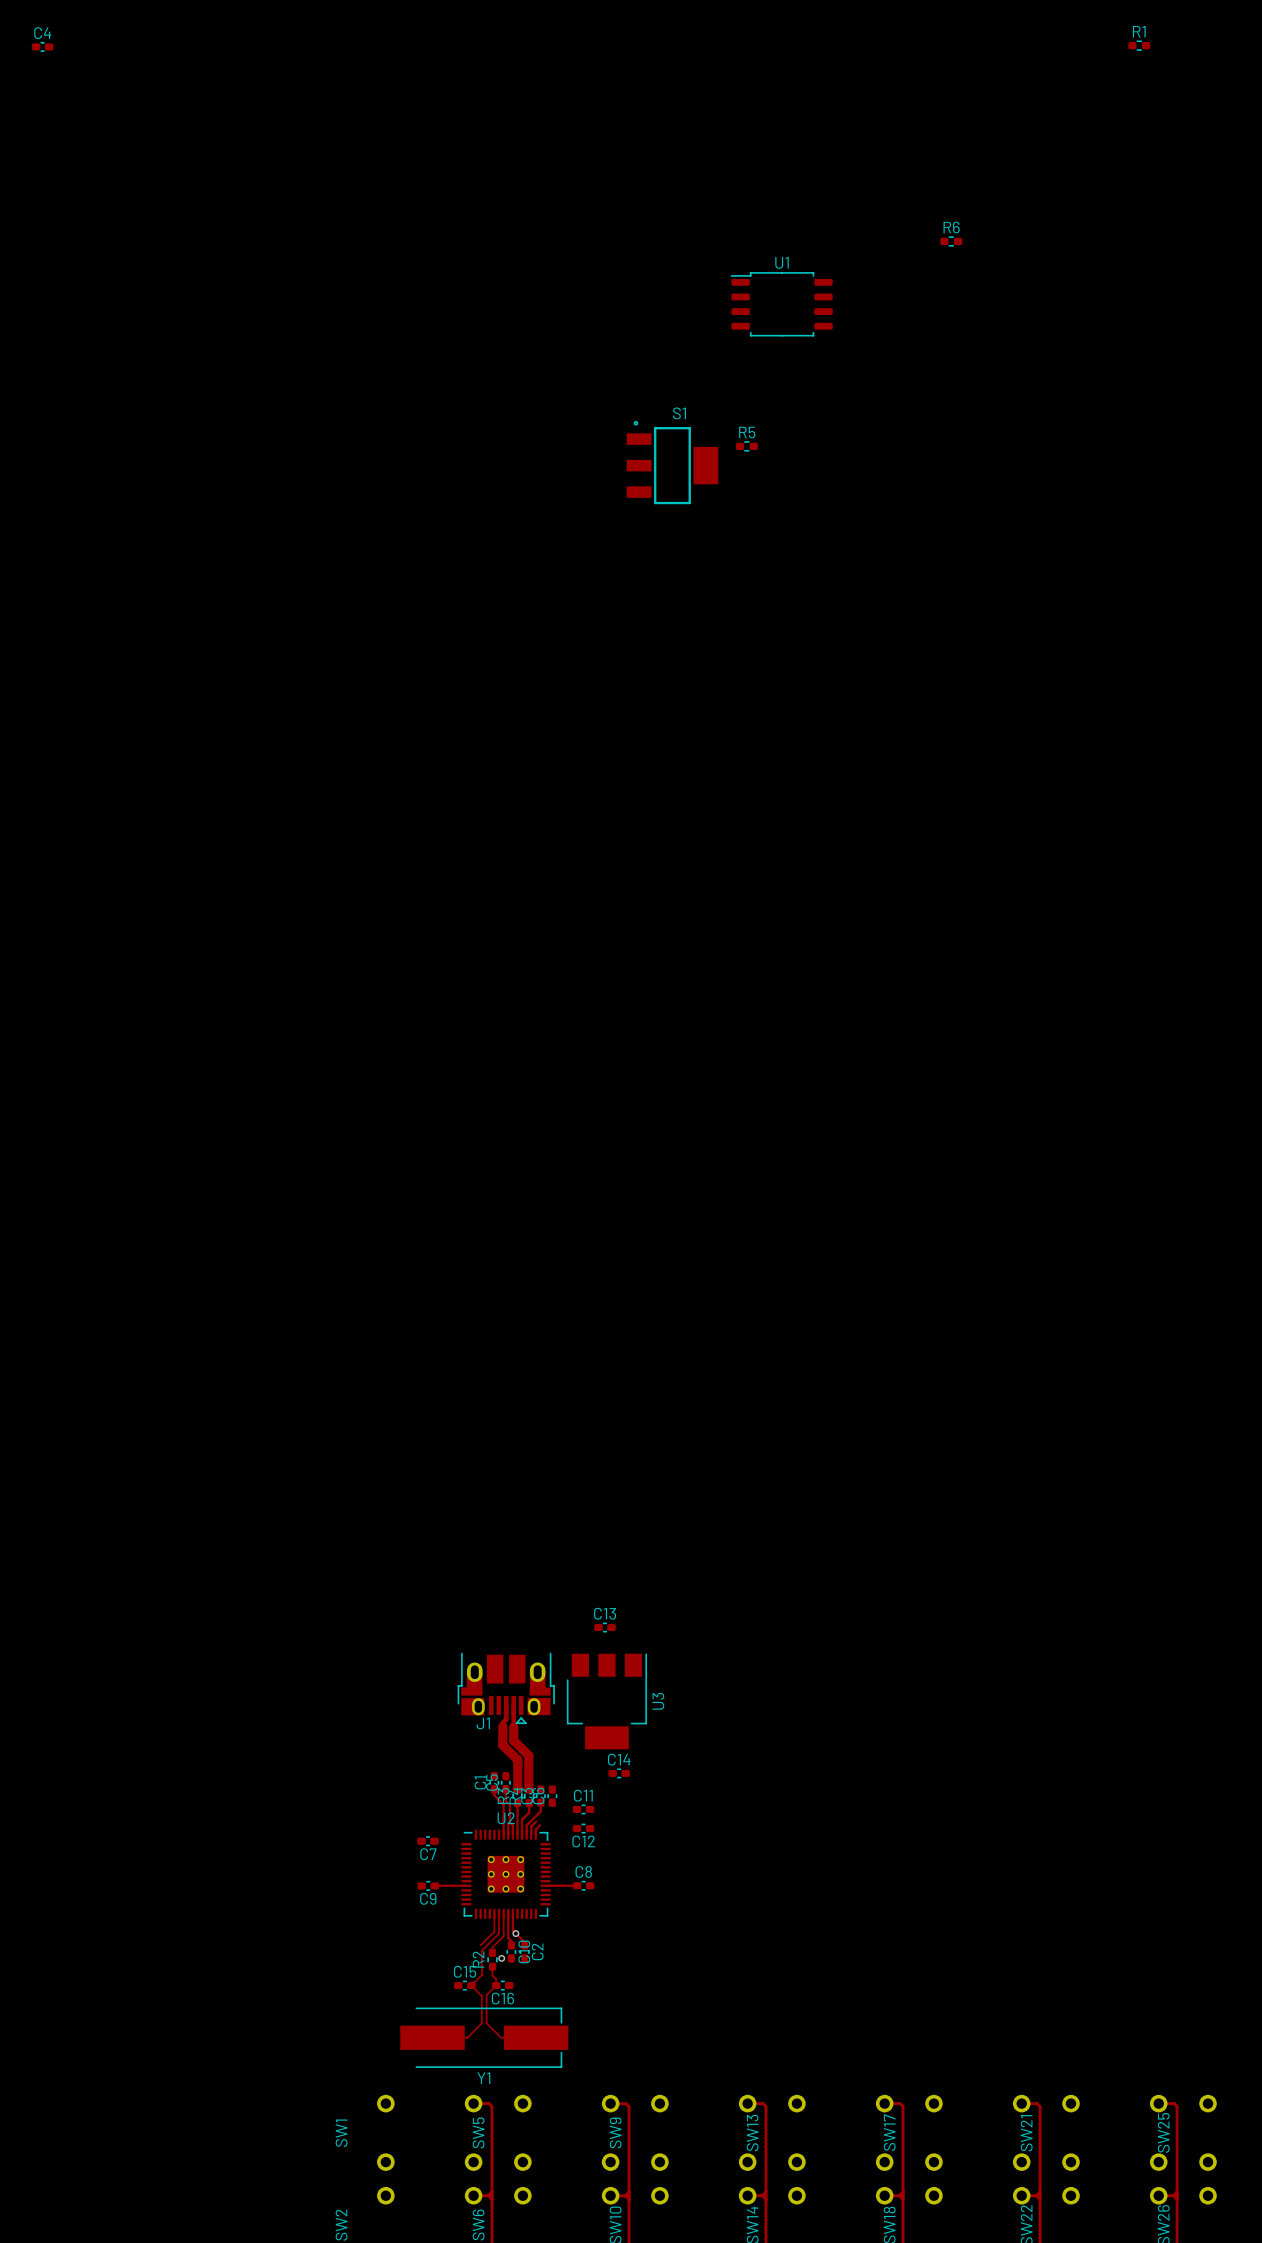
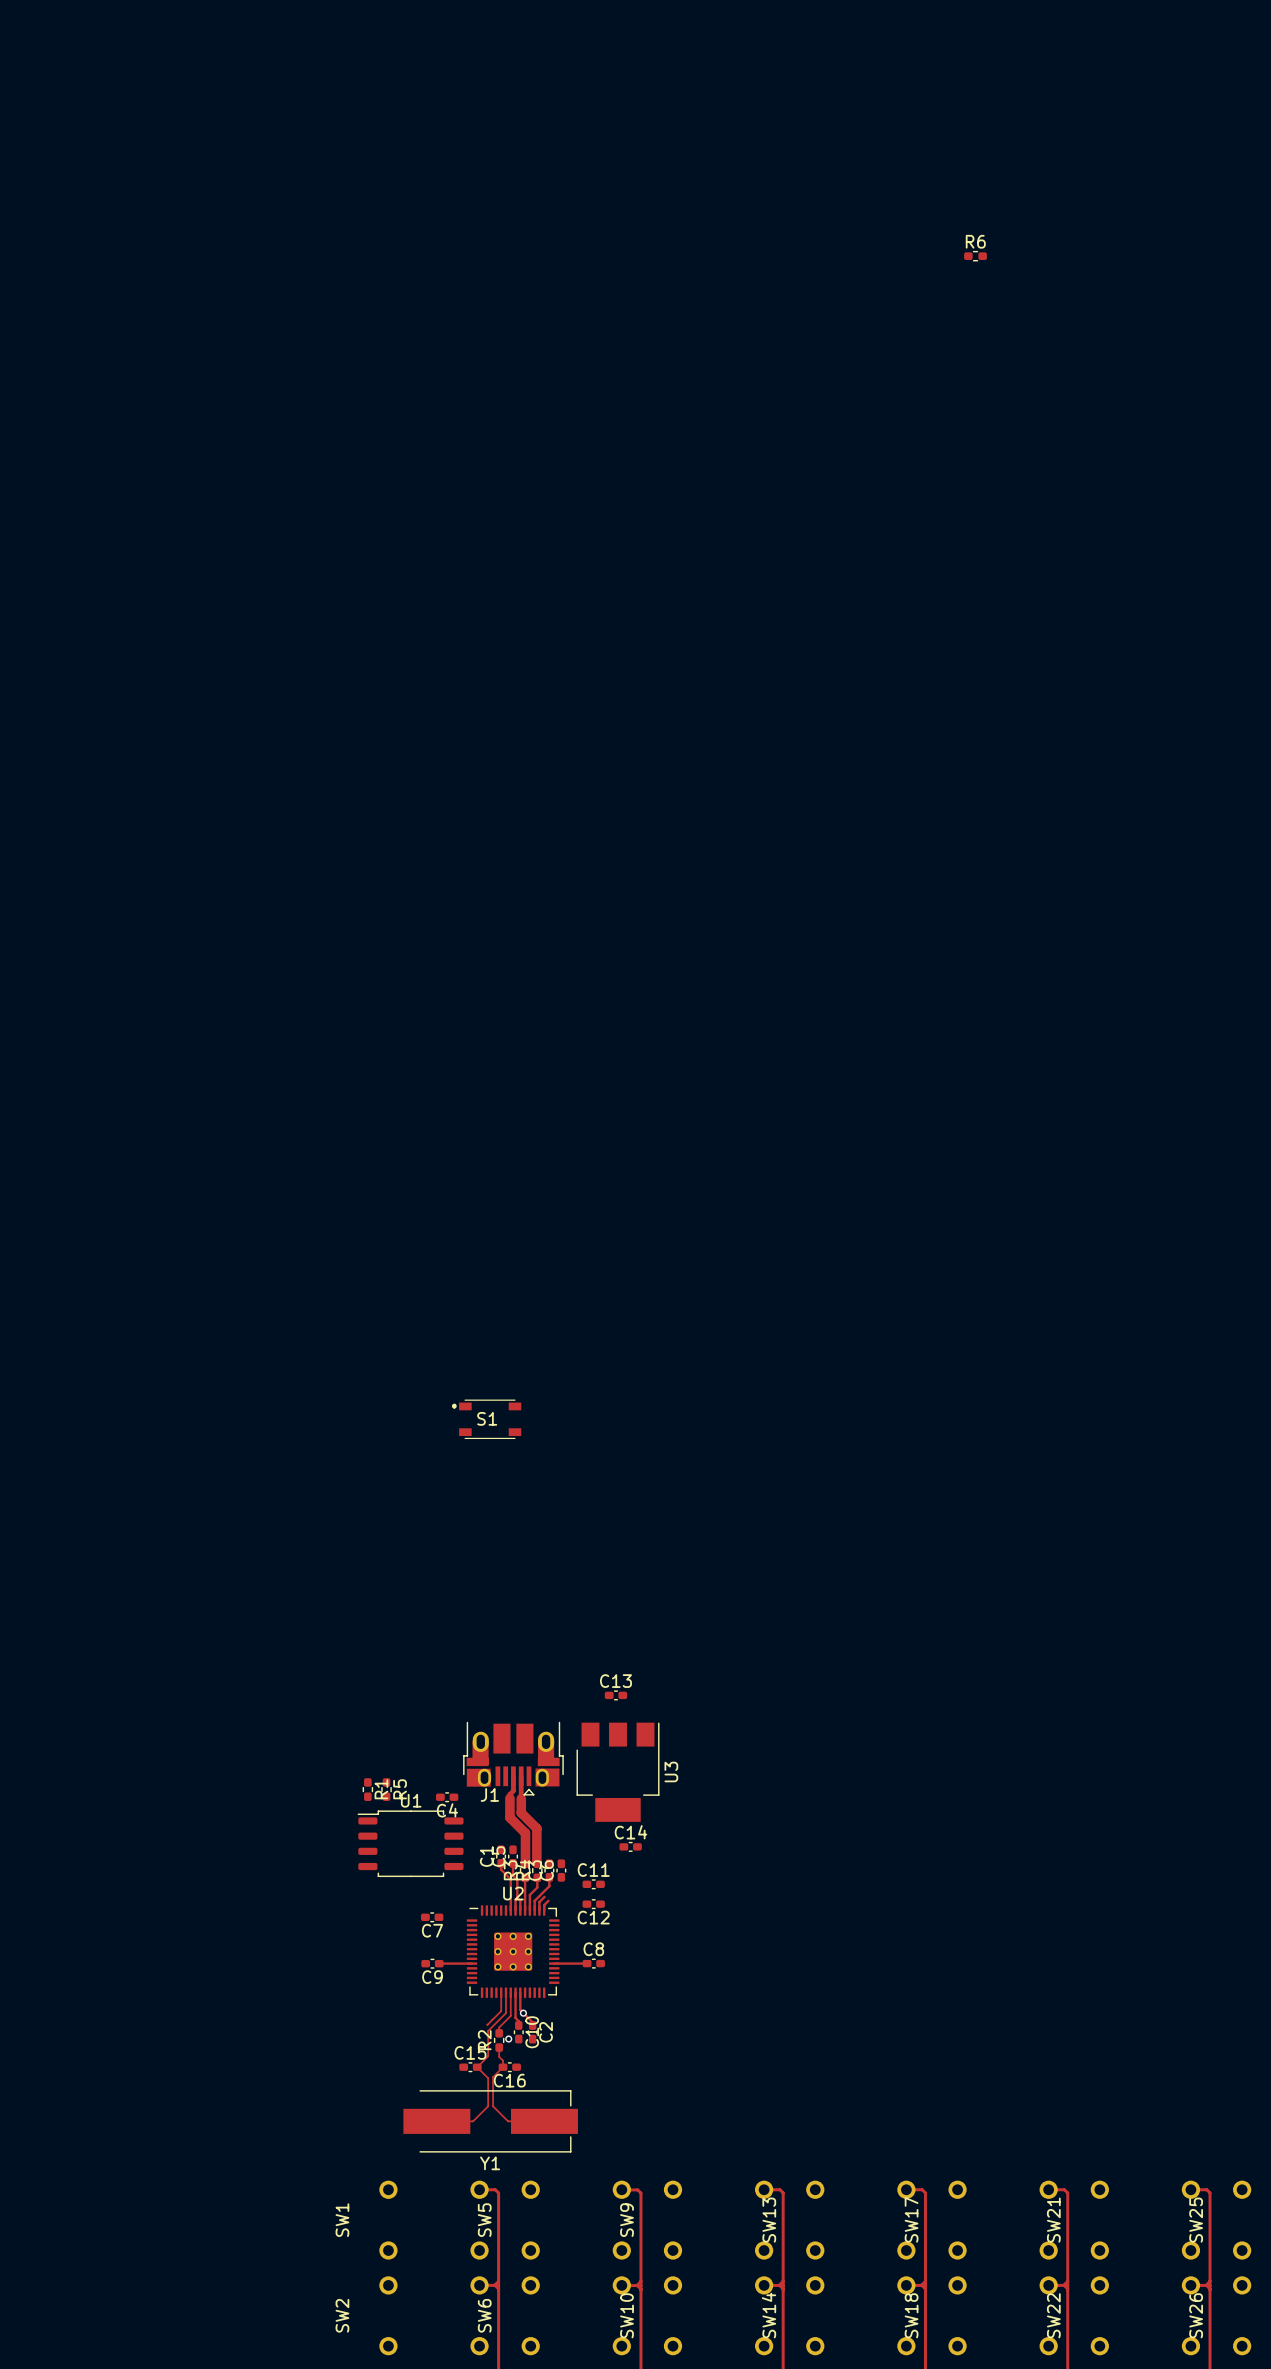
C4 name position: C4 (42, 33) -> C4 (447, 1810)
R1 rotation: 0° (1139, 45) -> 90° clockwise (367, 1789)
R1 position: (1139, 45) -> (367, 1789)
C4 position: (42, 46) -> (447, 1797)
U1 position: (781, 304) -> (410, 1843)
S1 name position: S1 (679, 413) -> S1 (487, 1418)
S1 footprint: [626, 420, 719, 505] -> [451, 1399, 522, 1440]
R5 rotation: 0° (746, 446) -> 90° clockwise (386, 1789)
R5 position: (746, 446) -> (386, 1789)

